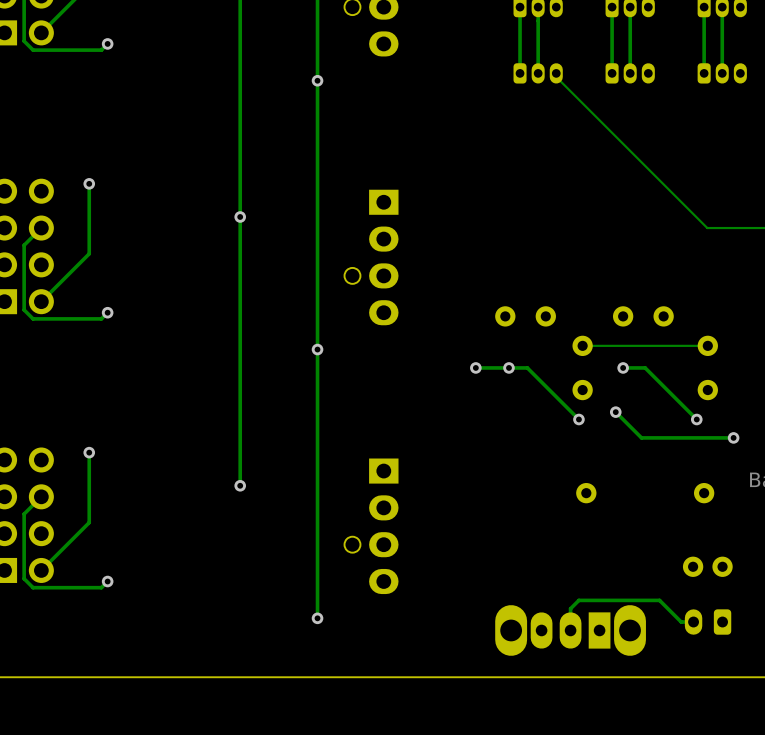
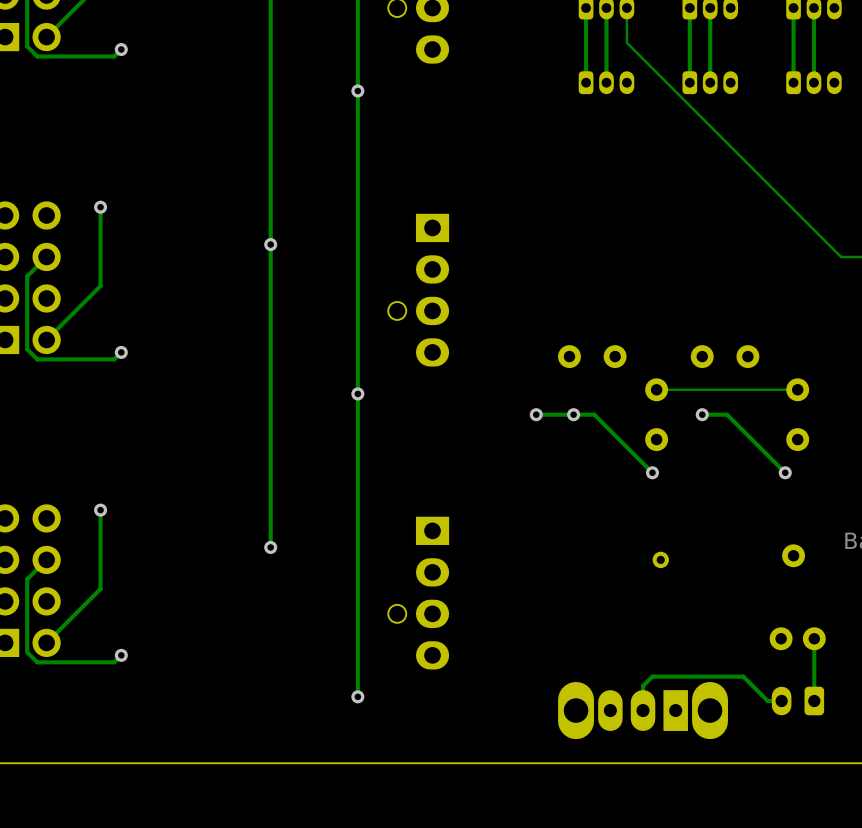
track: (556, 73) (556, 77) (707, 228) (746, 228) -> (626, 8) (626, 42) (841, 256)
track: (615, 412) (641, 437) (733, 437) -> none
via: (615, 412) -> none
via: (733, 437) -> none
part footprint: [576, 482, 597, 504] -> [652, 551, 669, 569]
track: none -> (814, 638) (814, 701)

